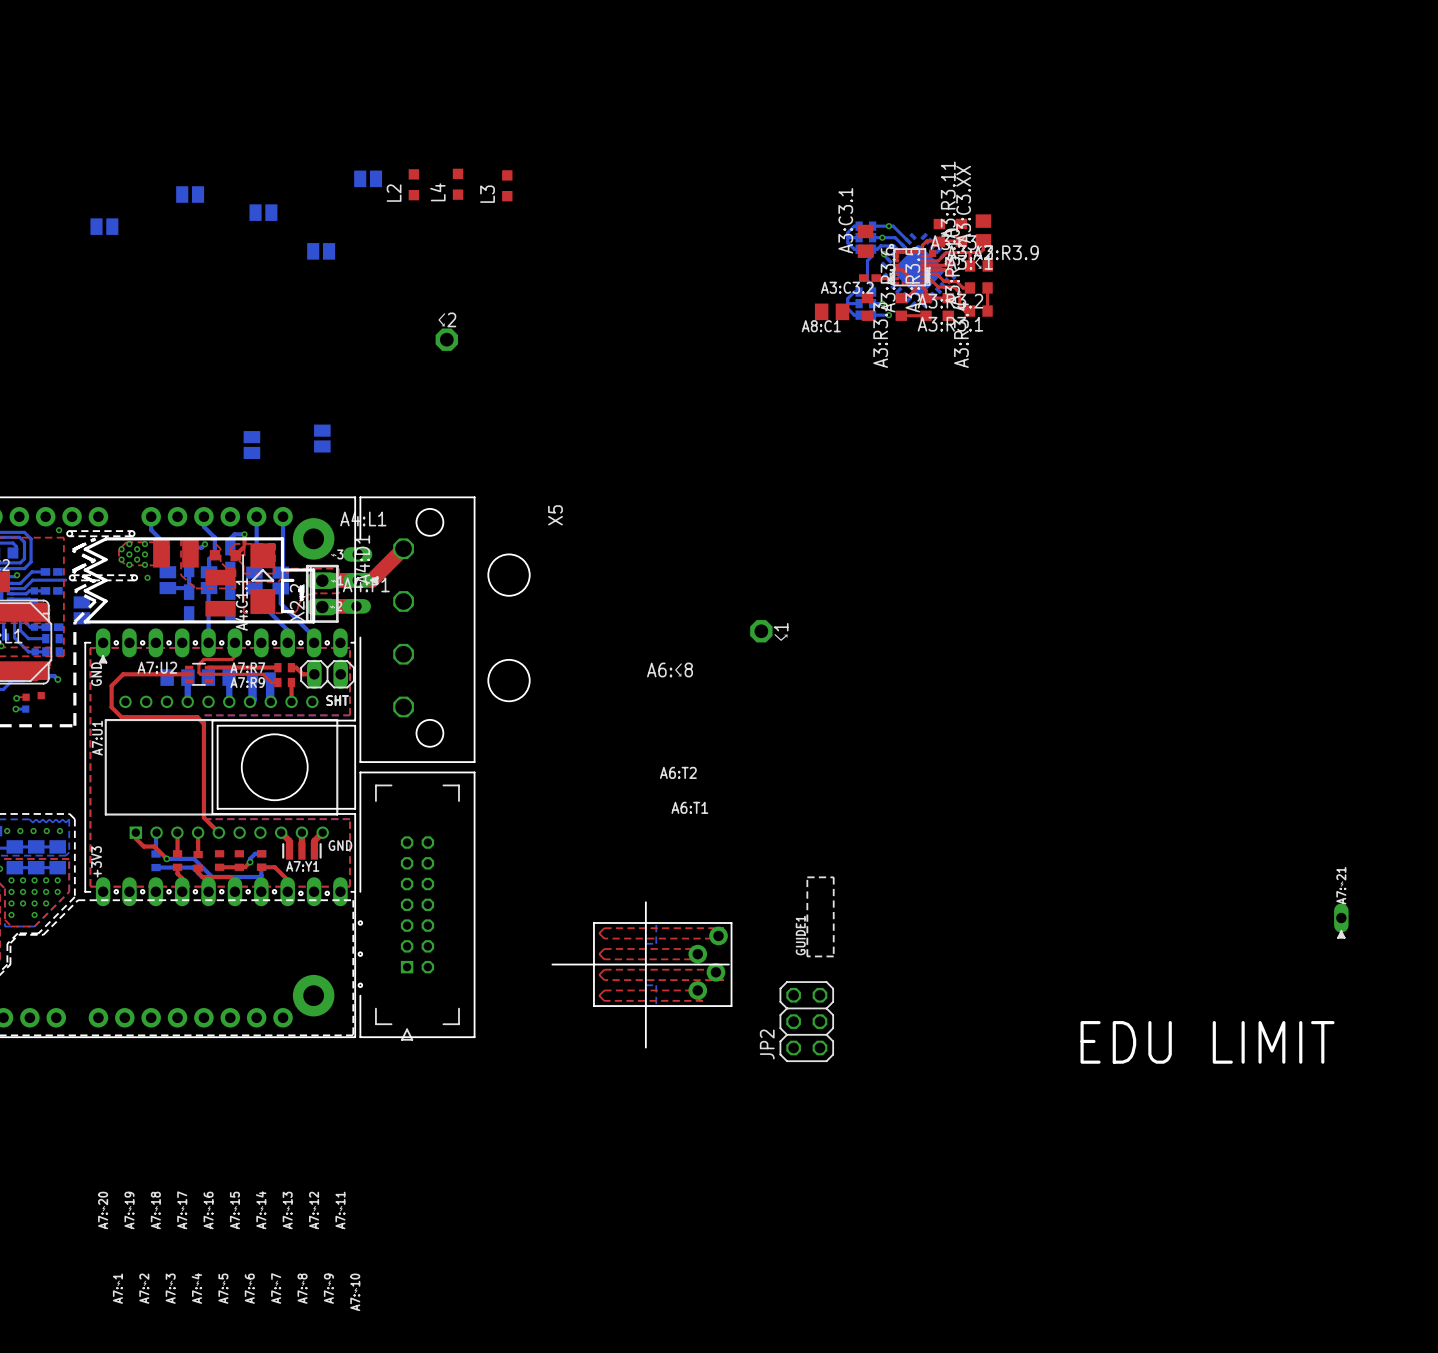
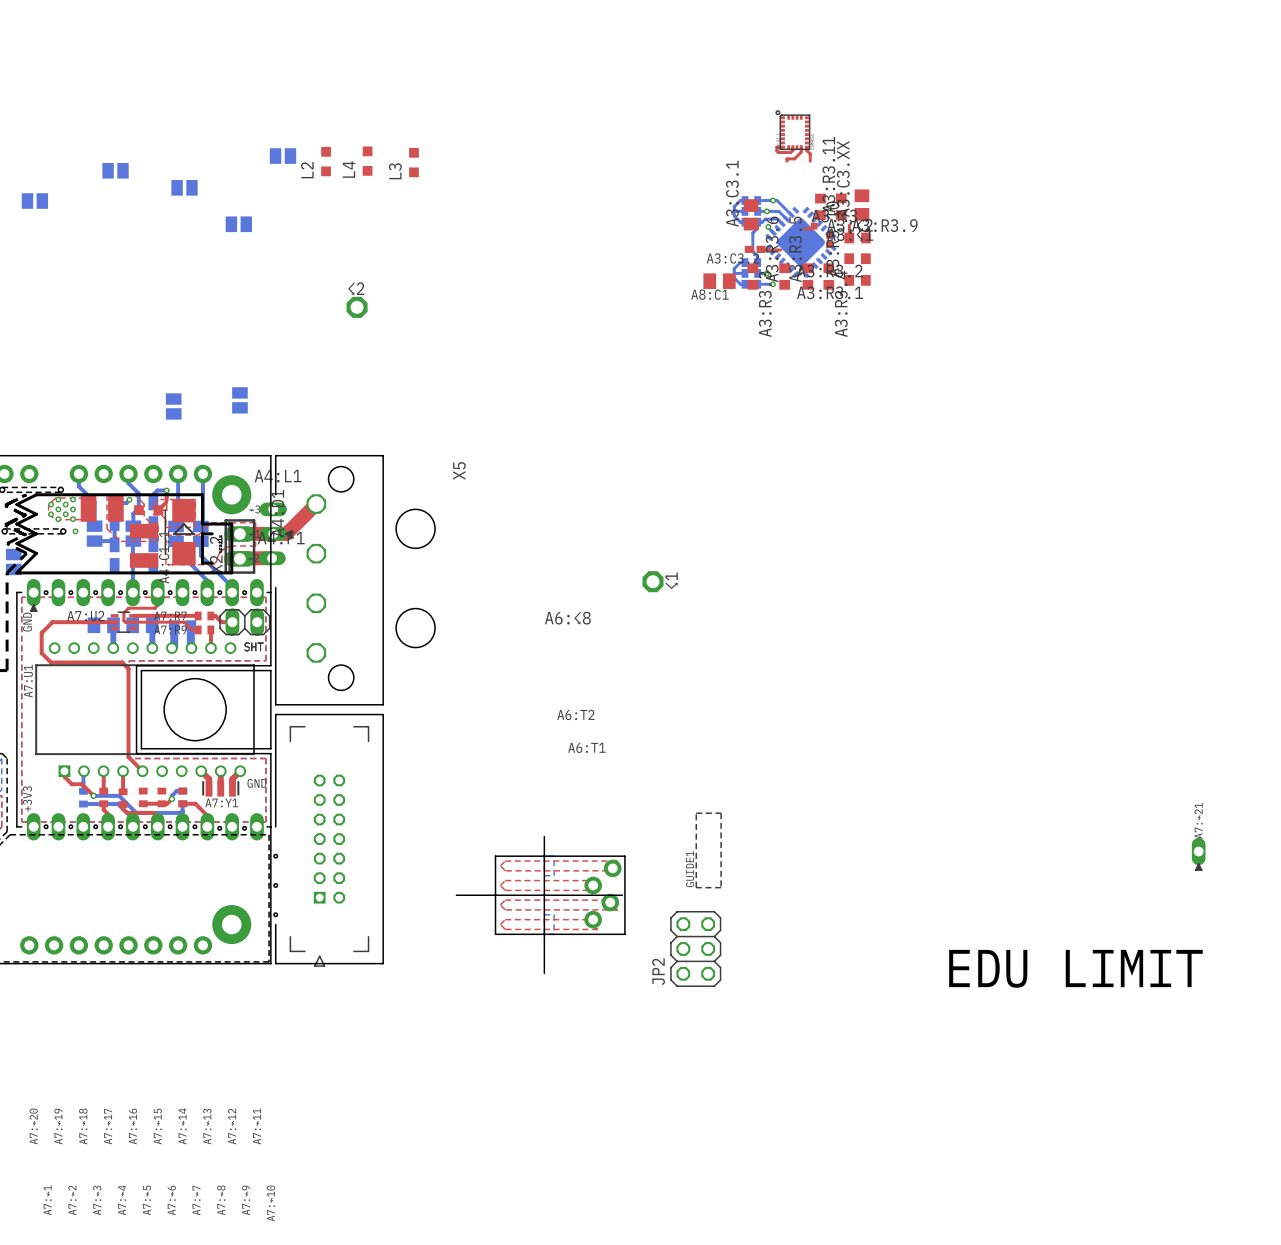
top track: none -> (782, 147) (776, 147) (776, 150) (790, 152) (792, 147)
top track: none -> (806, 147) (806, 150) (810, 154) (810, 161)
top track: (983, 240) (983, 249) (980, 252) (946, 252) (938, 260) (922, 260) -> none
top track: (961, 241) (926, 240) (922, 245) (922, 251) -> none
top track: (916, 251) (897, 251) (897, 260) -> none
top track: (949, 263) (944, 265) (922, 265) -> none
part position: (907, 264) -> (792, 129)
top track: (897, 269) (902, 269) (907, 275) (907, 283) -> none
top track: (922, 269) (944, 269) (949, 273) -> none
top track: (922, 274) (937, 274) (944, 281) (956, 281) (963, 287) (969, 287) -> none
top track: (922, 278) (929, 278) (938, 287) (954, 287) (959, 292) (959, 306) (964, 311) (969, 311) -> none
top track: (916, 283) (916, 288) (909, 295) (901, 295) (901, 298) -> (801, 147) (801, 152) (794, 158) (786, 158) (786, 161)
top track: (922, 283) (922, 286) (926, 290) (926, 298) (948, 298) -> none
top track: (987, 287) (987, 311) -> none
top track: (901, 315) (926, 315) -> none

